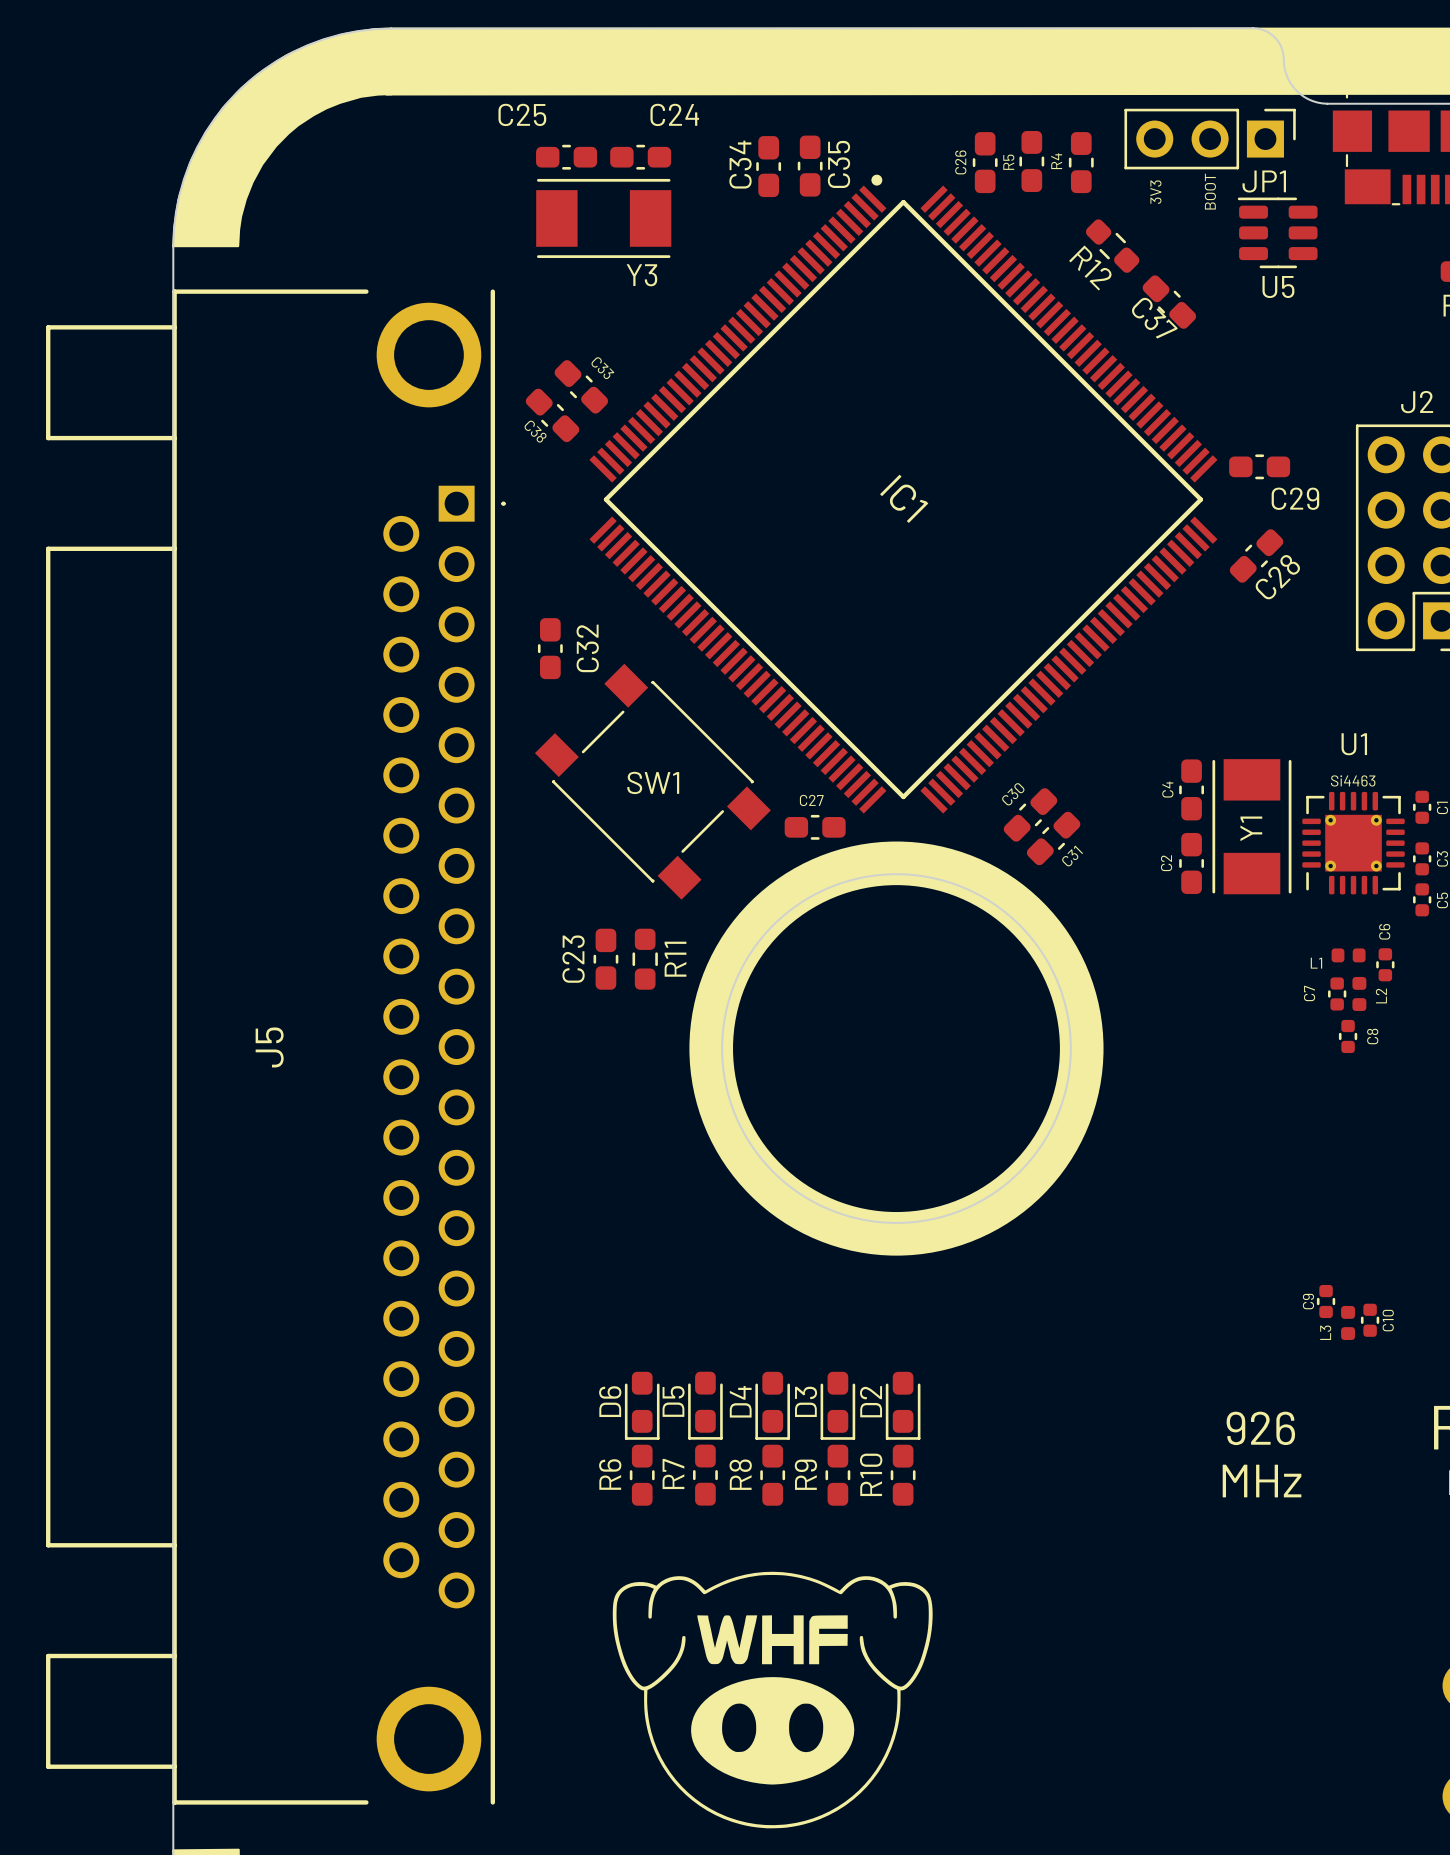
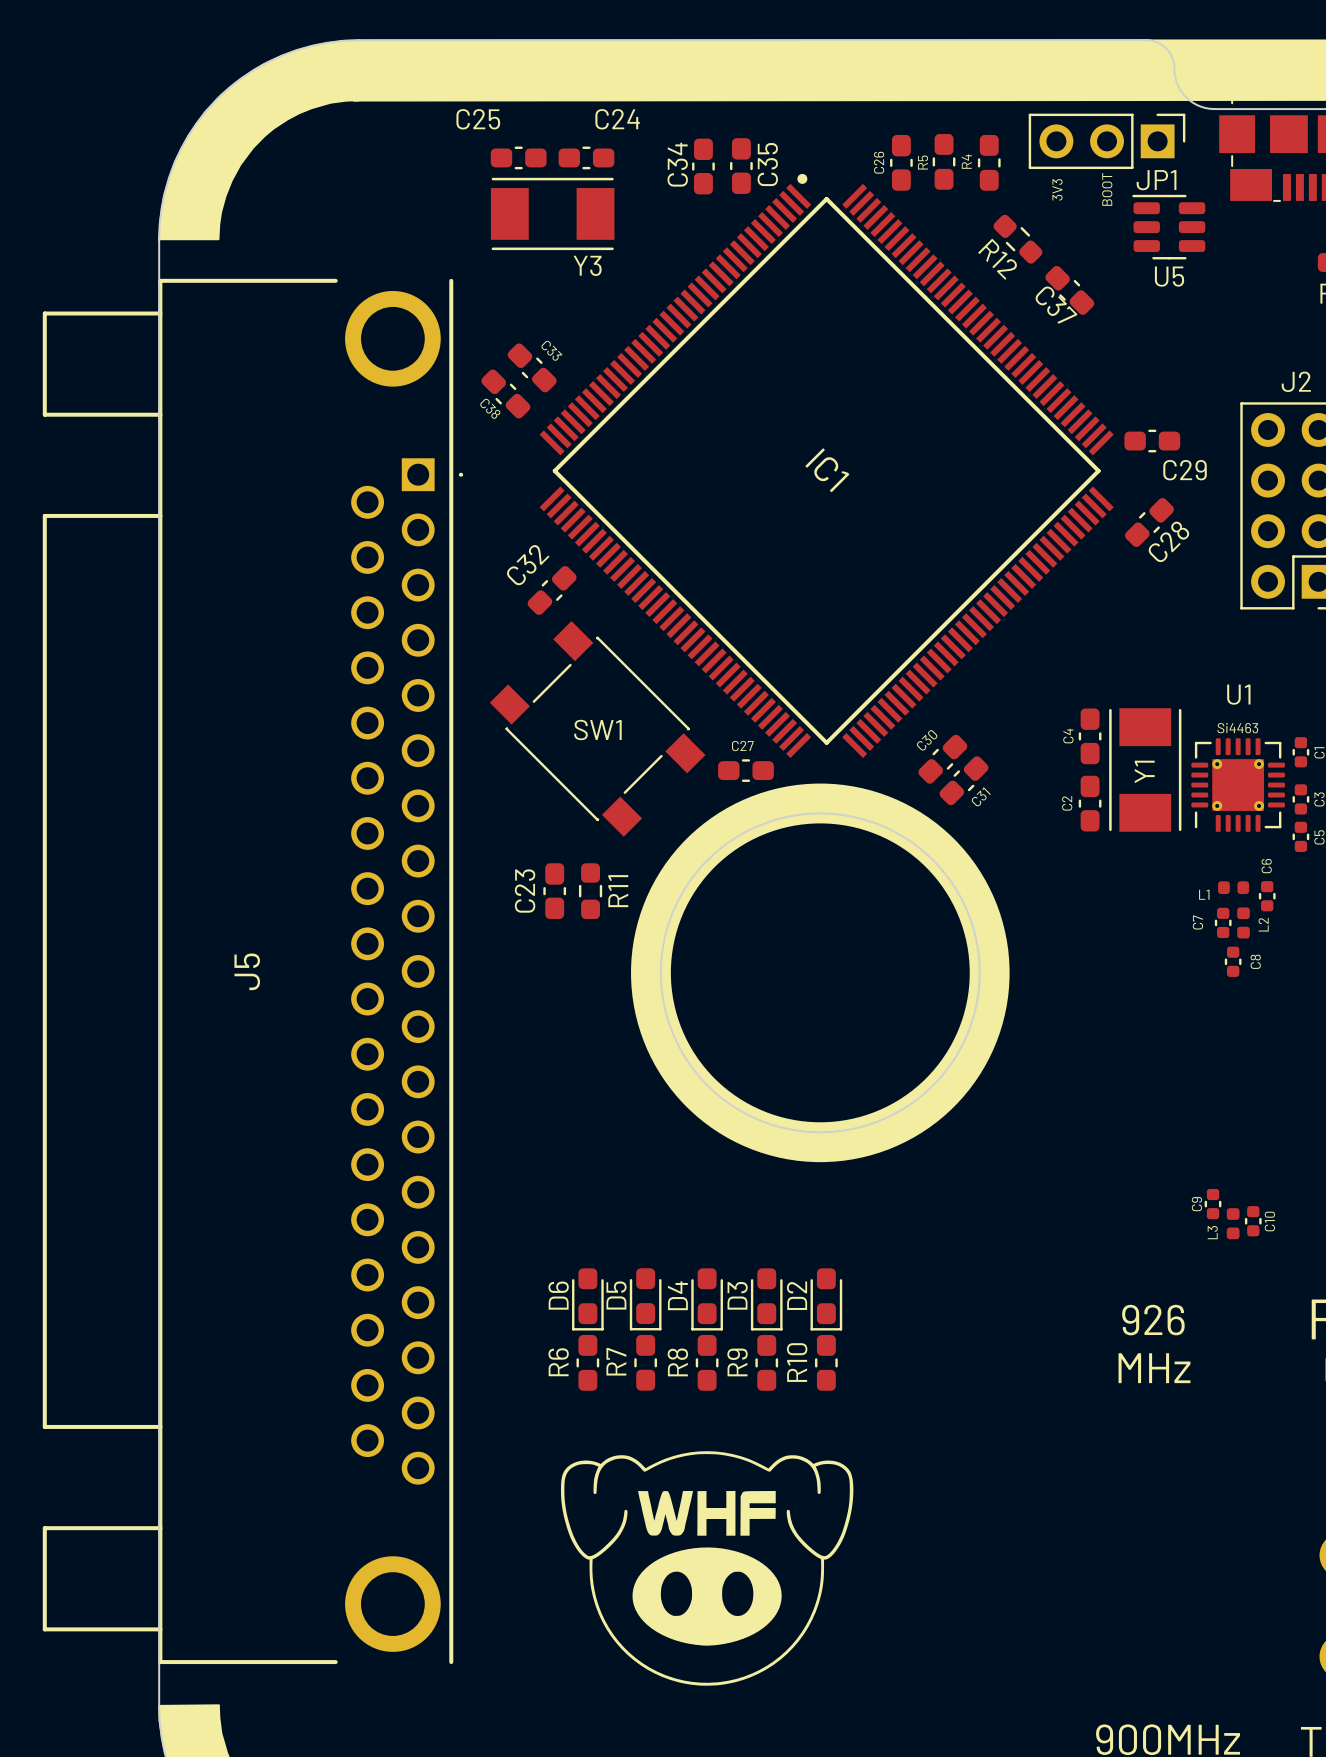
C32 rotation: 0° (550, 648) -> 45° clockwise (552, 590)
C32 position: (550, 648) -> (552, 590)
C32 name position: C32 (587, 648) -> C32 (528, 565)

